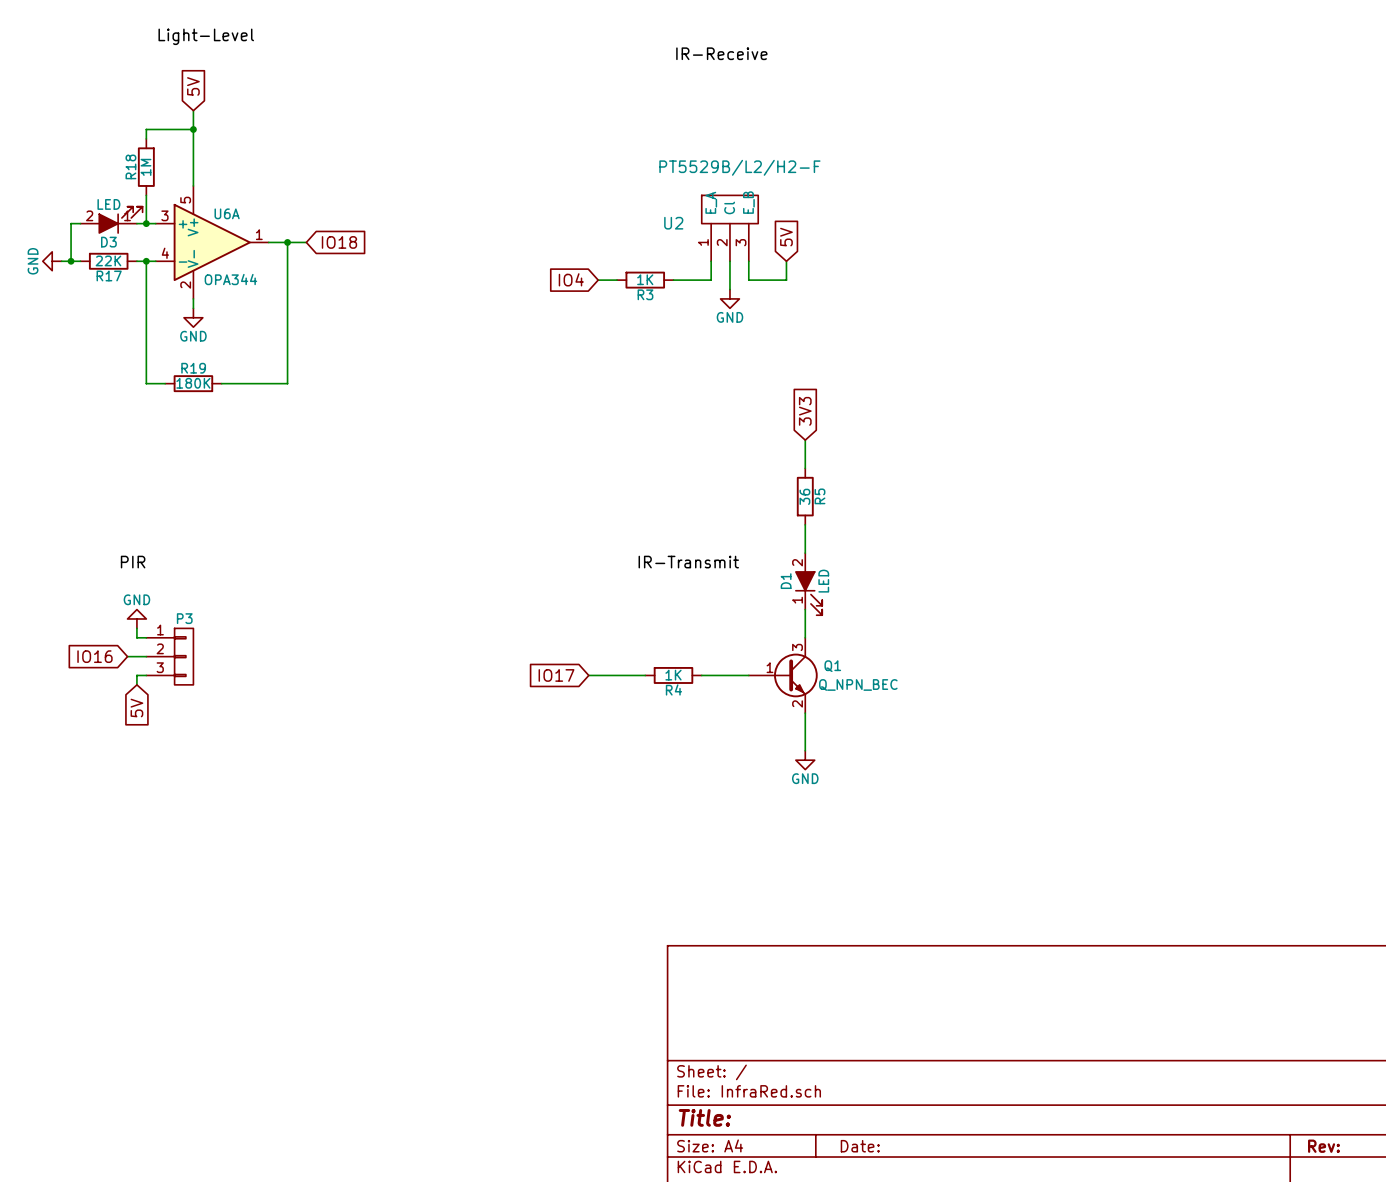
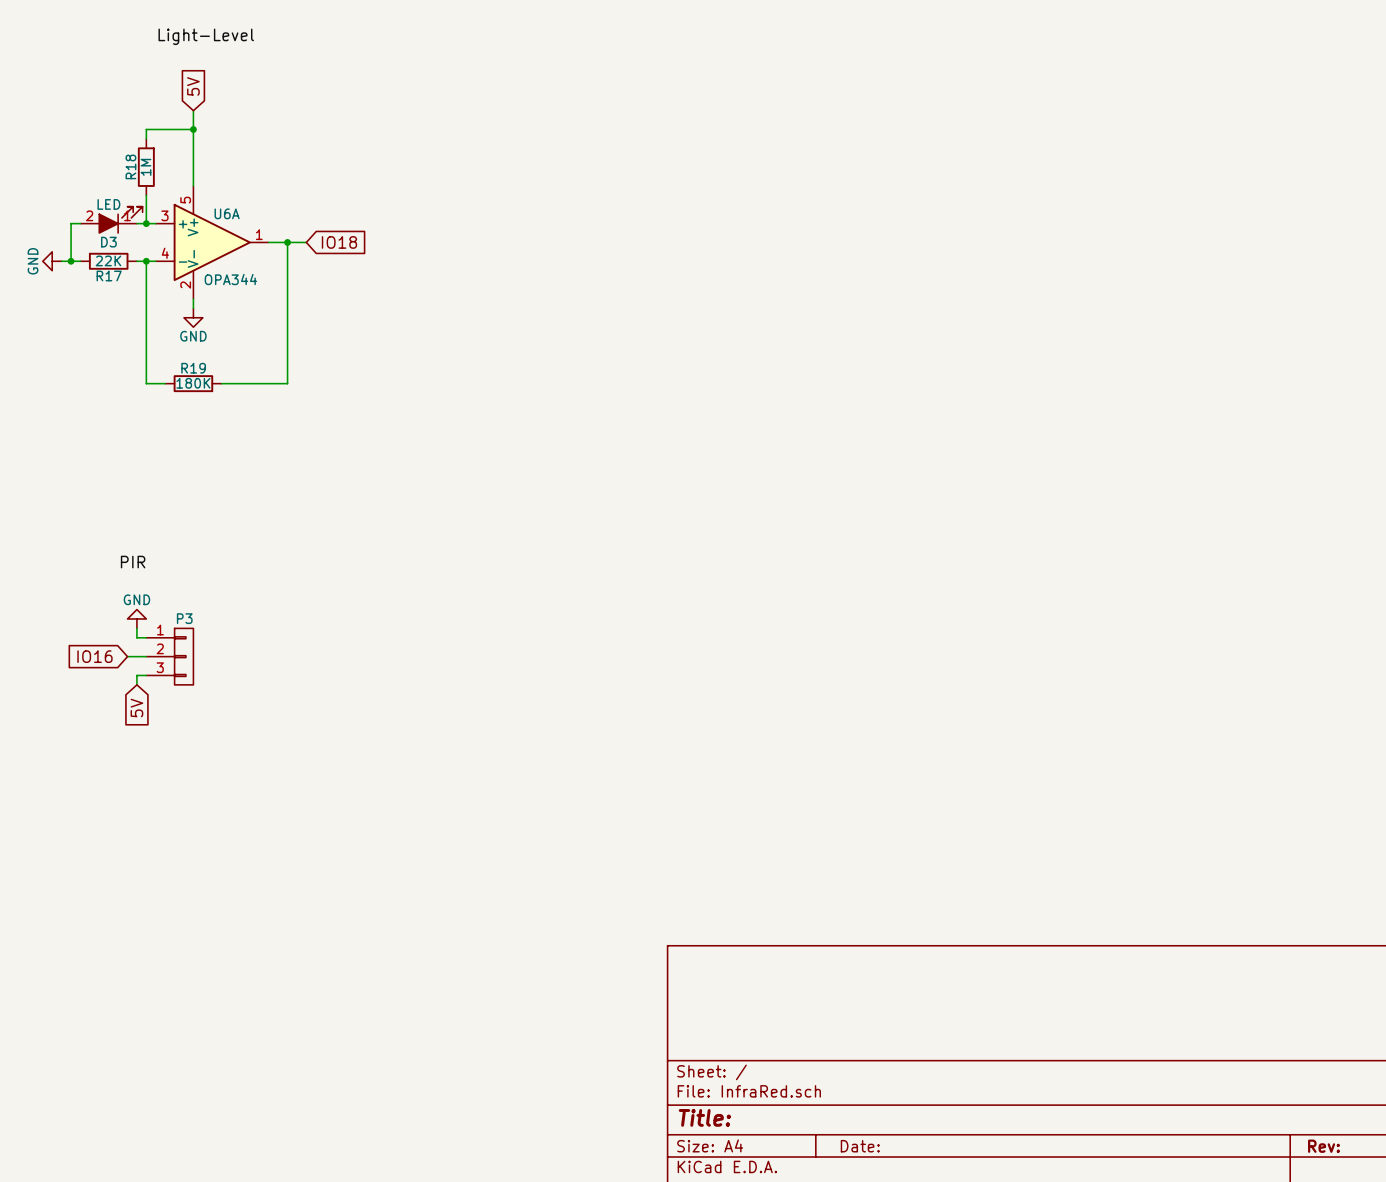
label: IR-Receive (721, 53) -> none
U2: PT5529B/L2/H2-F (729, 228) -> none
global label: 5V (786, 237) -> none
wire: (711, 261) (711, 280) (673, 280) -> none
wire: (729, 261) (729, 289) -> none
wire: (748, 261) (748, 280) (786, 280) (786, 261) -> none
global label: IO4 (571, 279) -> none
wire: (598, 280) (617, 280) -> none
R3: 1K (645, 280) -> none
power symbol: GND (729, 298) -> none
global label: 3V3 (805, 411) -> none
wire: (805, 440) (805, 468) -> none
R5: 36 (805, 496) -> none
wire: (805, 524) (805, 553) -> none
label: IR-Transmit (688, 562) -> none
D1: LED (808, 584) -> none
wire: (805, 609) (805, 637) -> none
global label: IO17 (556, 675) -> none
wire: (588, 675) (645, 675) -> none
R4: 1K (673, 675) -> none
wire: (701, 675) (748, 675) -> none
Q1: Q_NPN_BEC (783, 675) -> none
wire: (805, 713) (805, 750) -> none
power symbol: GND (805, 760) -> none

